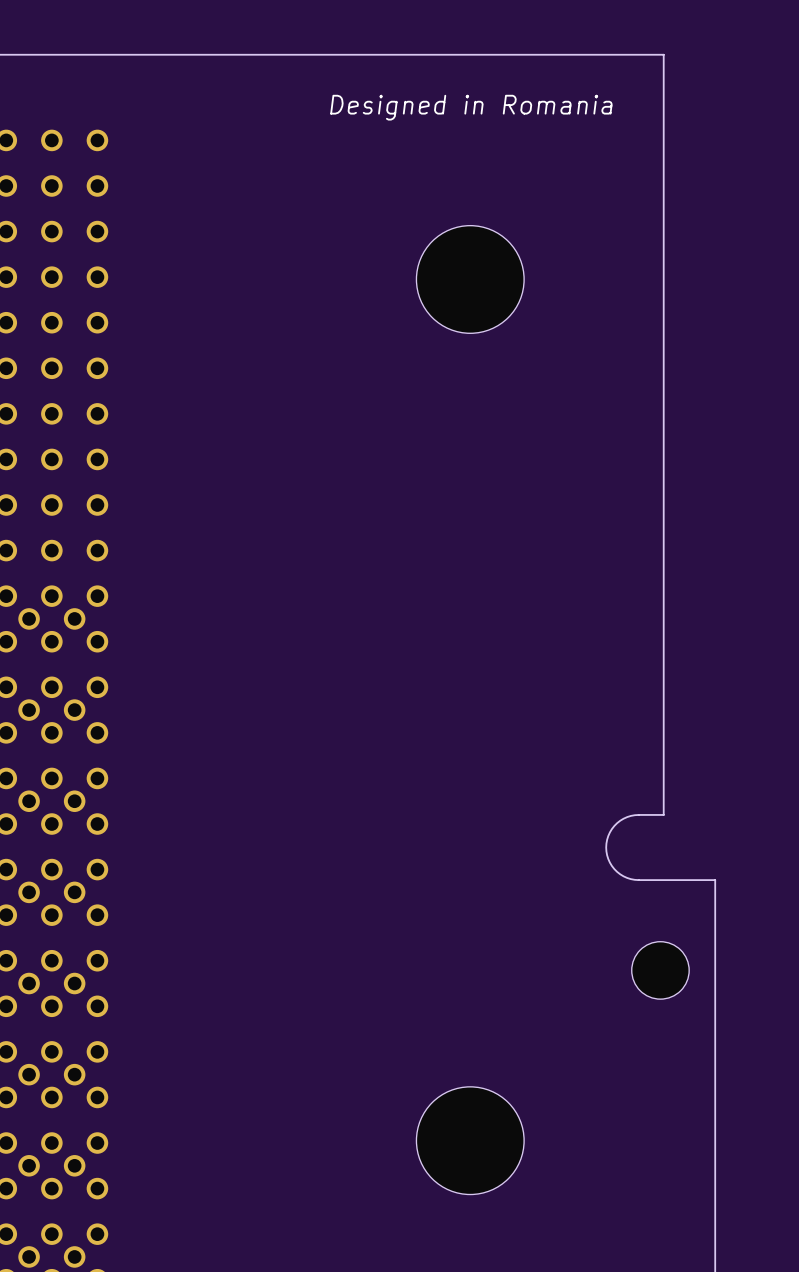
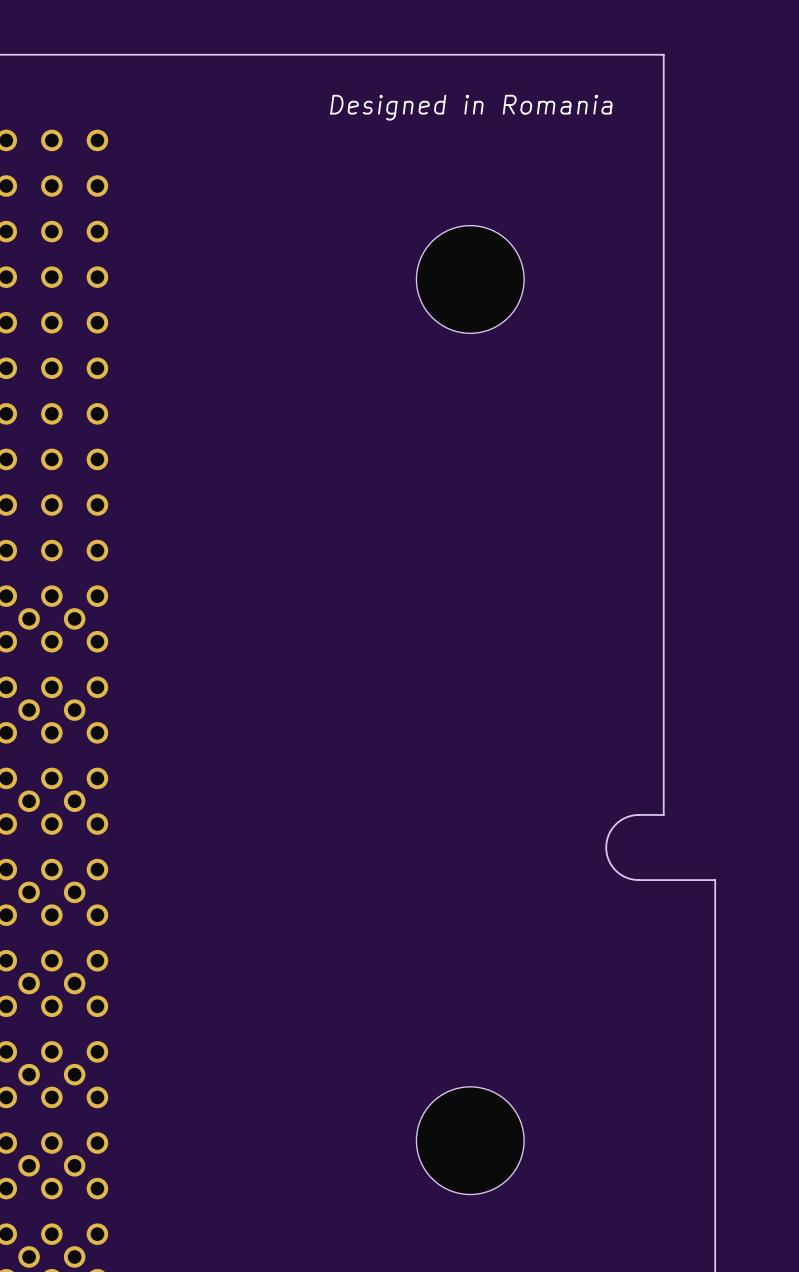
part: (660, 970) -> none

